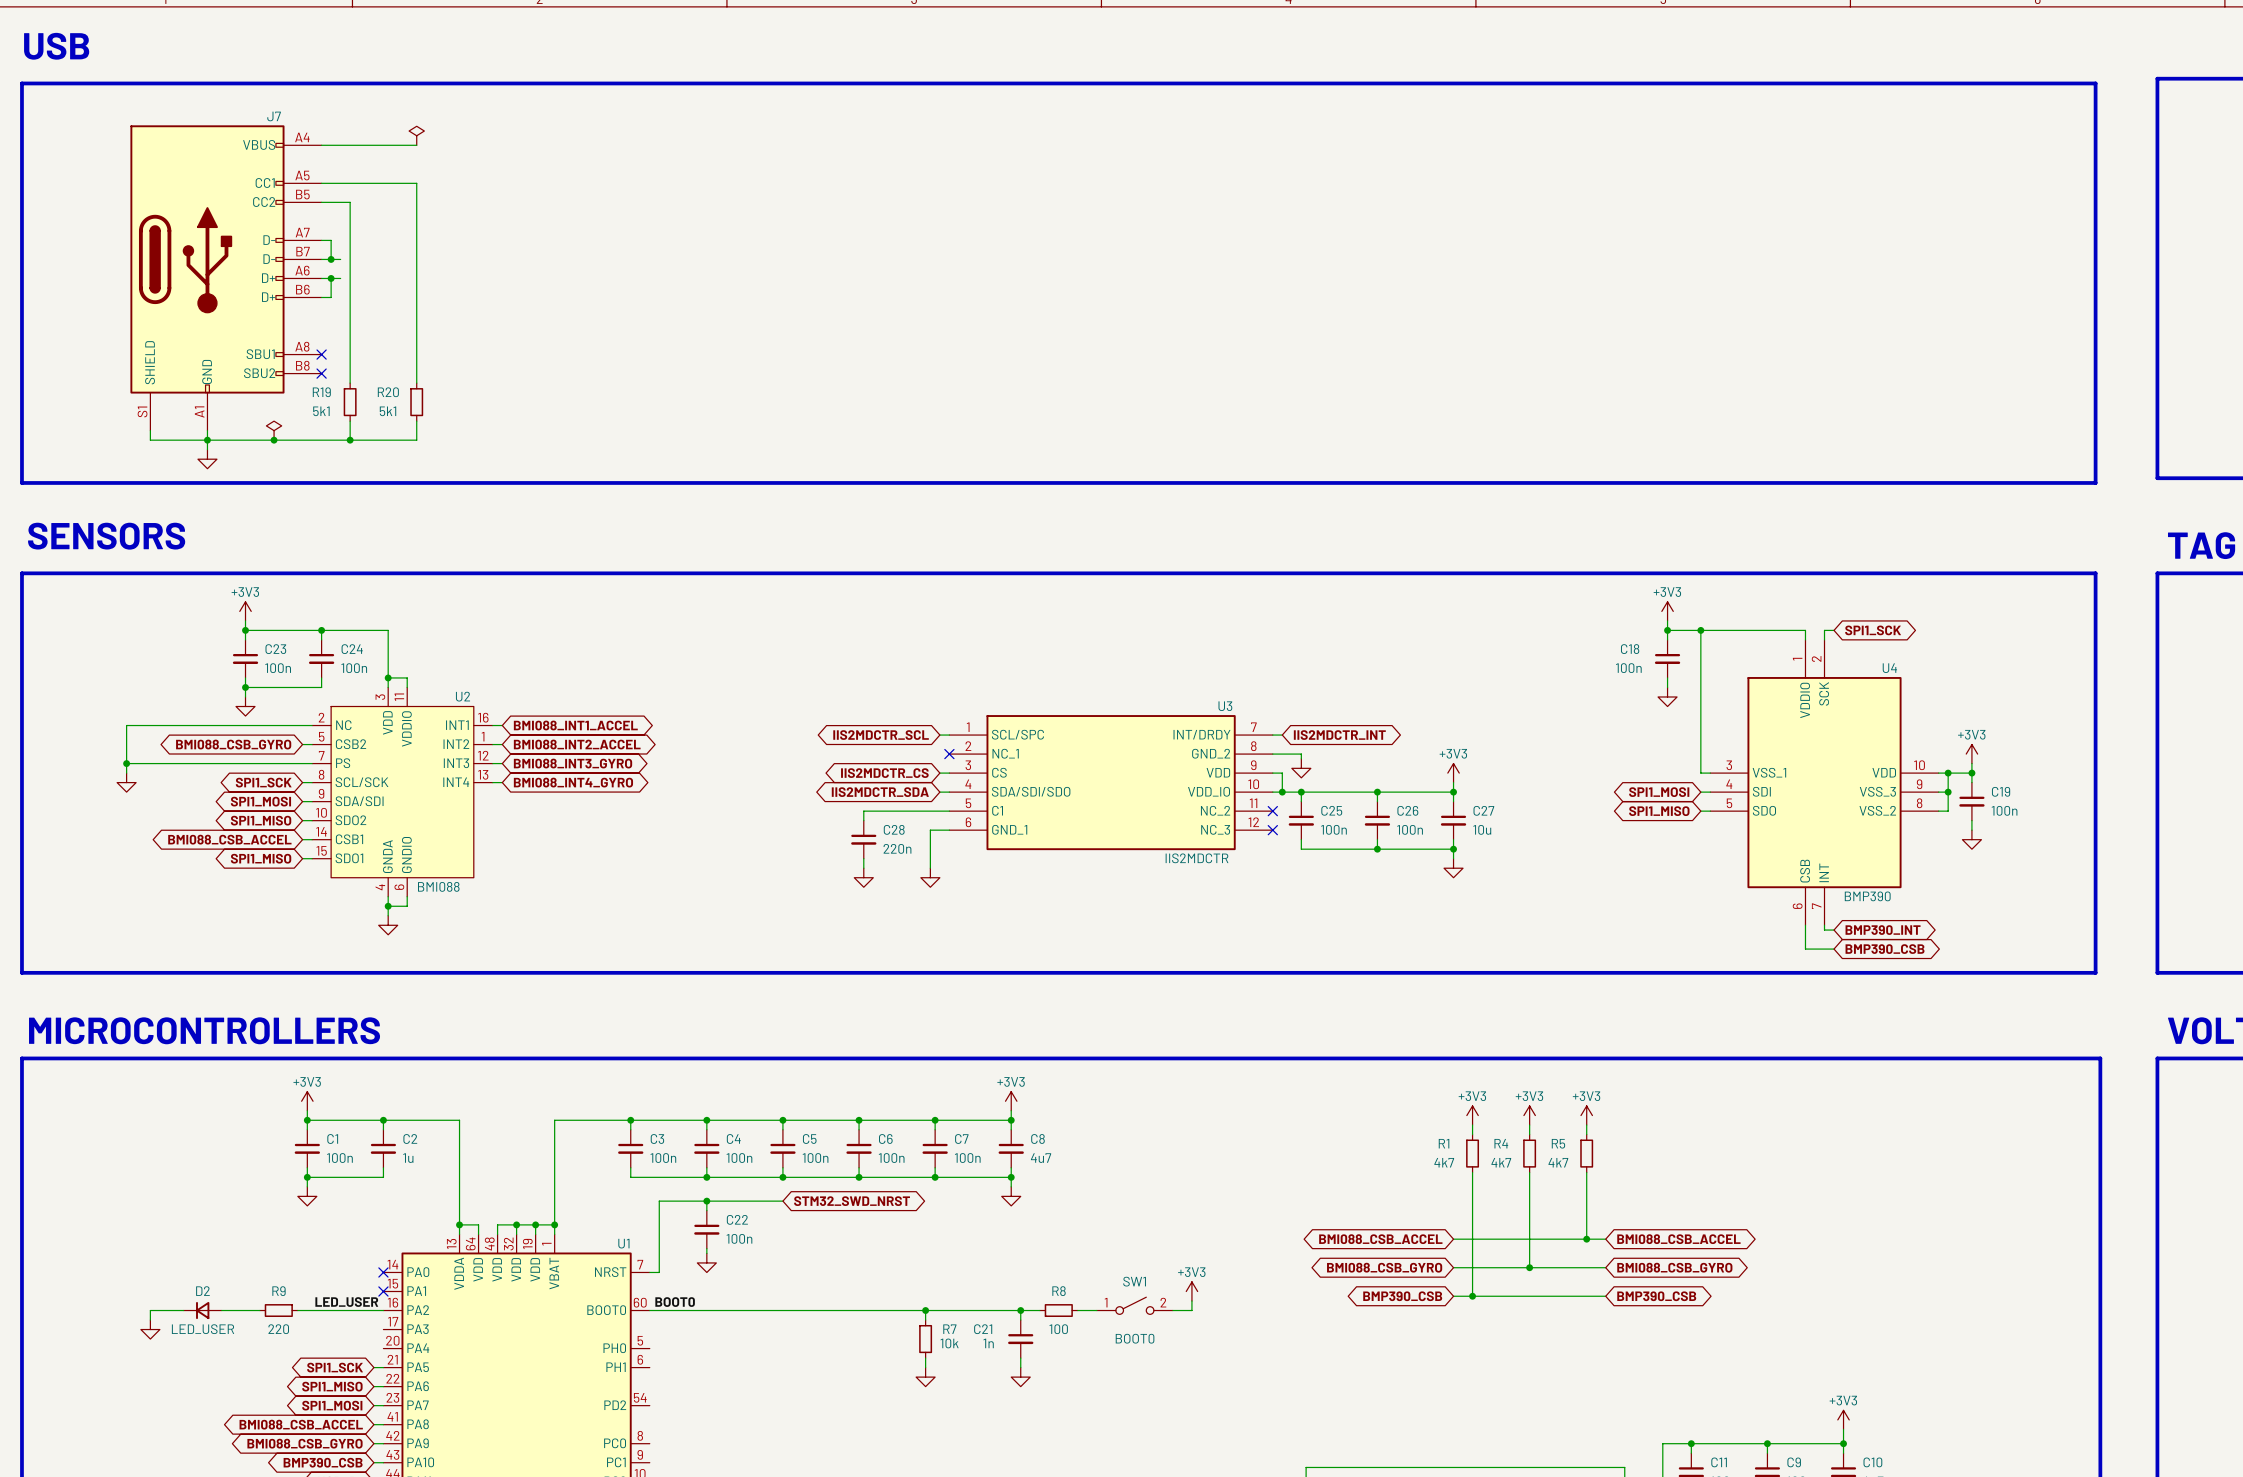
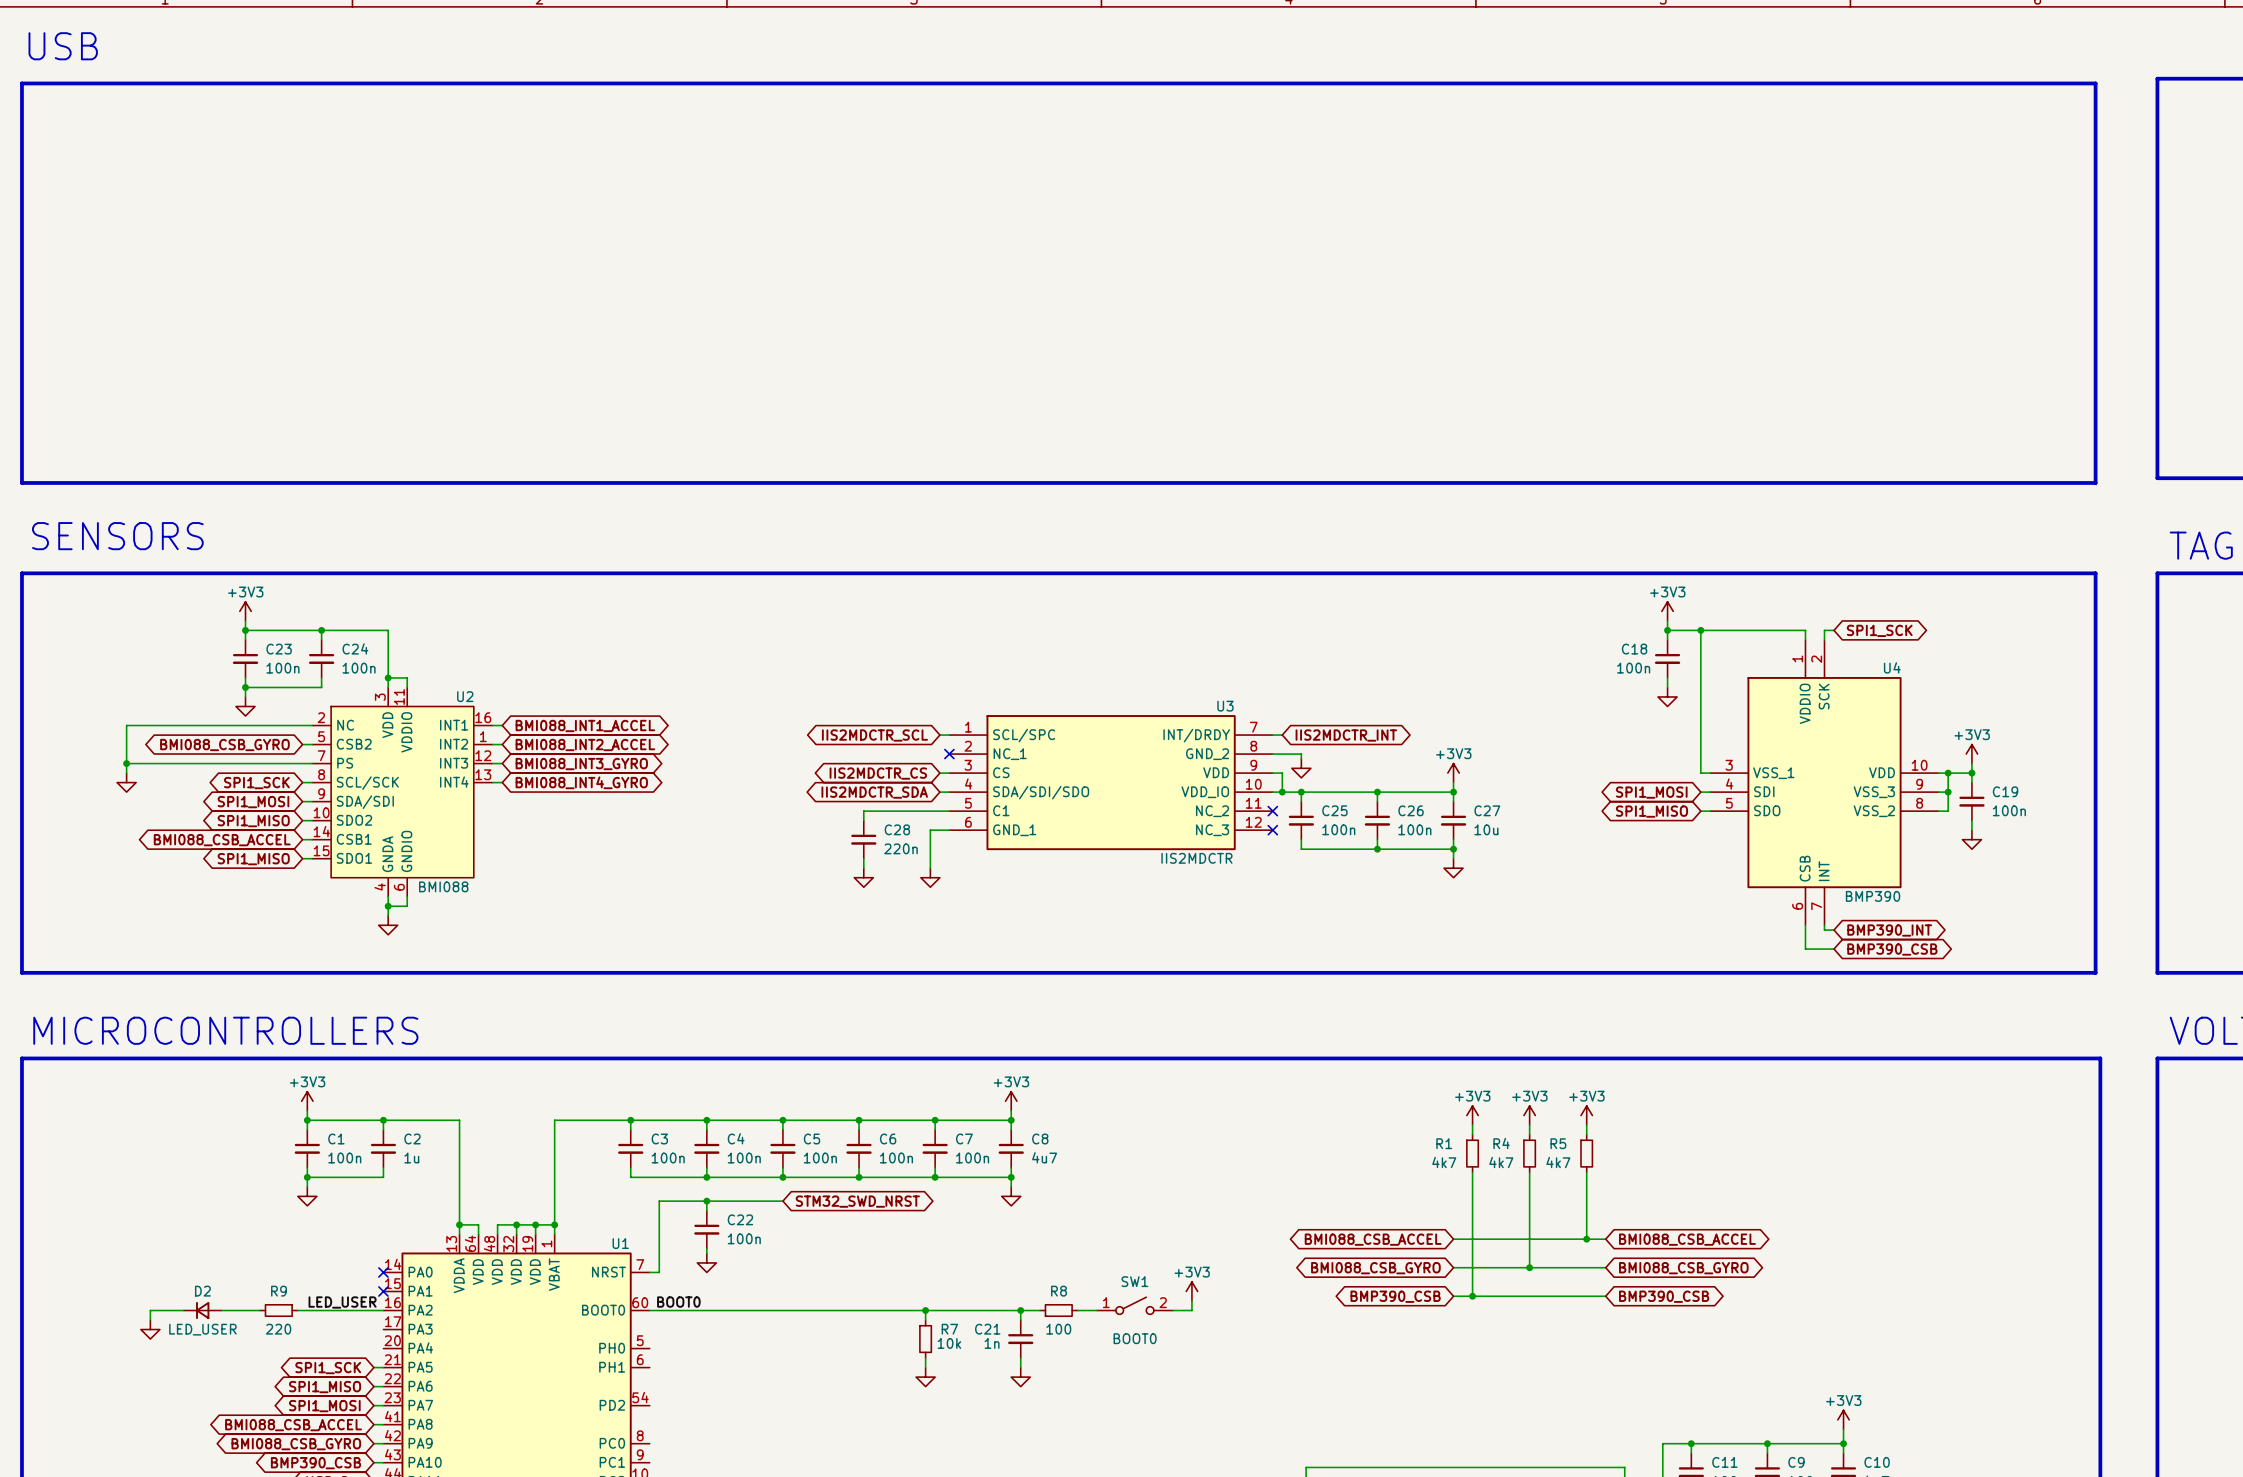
power symbol: (416, 135) -> none
wire: (321, 145) (416, 145) -> none
wire: (321, 183) (416, 183) (416, 383) -> none
wire: (321, 202) (350, 202) (350, 383) -> none
wire: (321, 240) (331, 240) (331, 259) -> none
wire: (321, 259) (340, 259) -> none
junction: (331, 259) -> none
J7: (226, 277) -> none
wire: (321, 278) (340, 278) -> none
wire: (331, 278) (331, 297) (321, 297) -> none
junction: (331, 278) -> none
no-connect mark: (321, 354) -> none
no-connect mark: (321, 373) -> none
R19: 5k1 (350, 402) -> none
R20: 5k1 (416, 402) -> none
wire: (350, 421) (350, 440) -> none
wire: (416, 421) (416, 440) (150, 440) (150, 430) -> none
wire: (207, 430) (207, 449) -> none
power symbol: (274, 430) -> none
junction: (207, 440) -> none
junction: (274, 440) -> none
junction: (350, 440) -> none
power symbol: (207, 459) -> none

